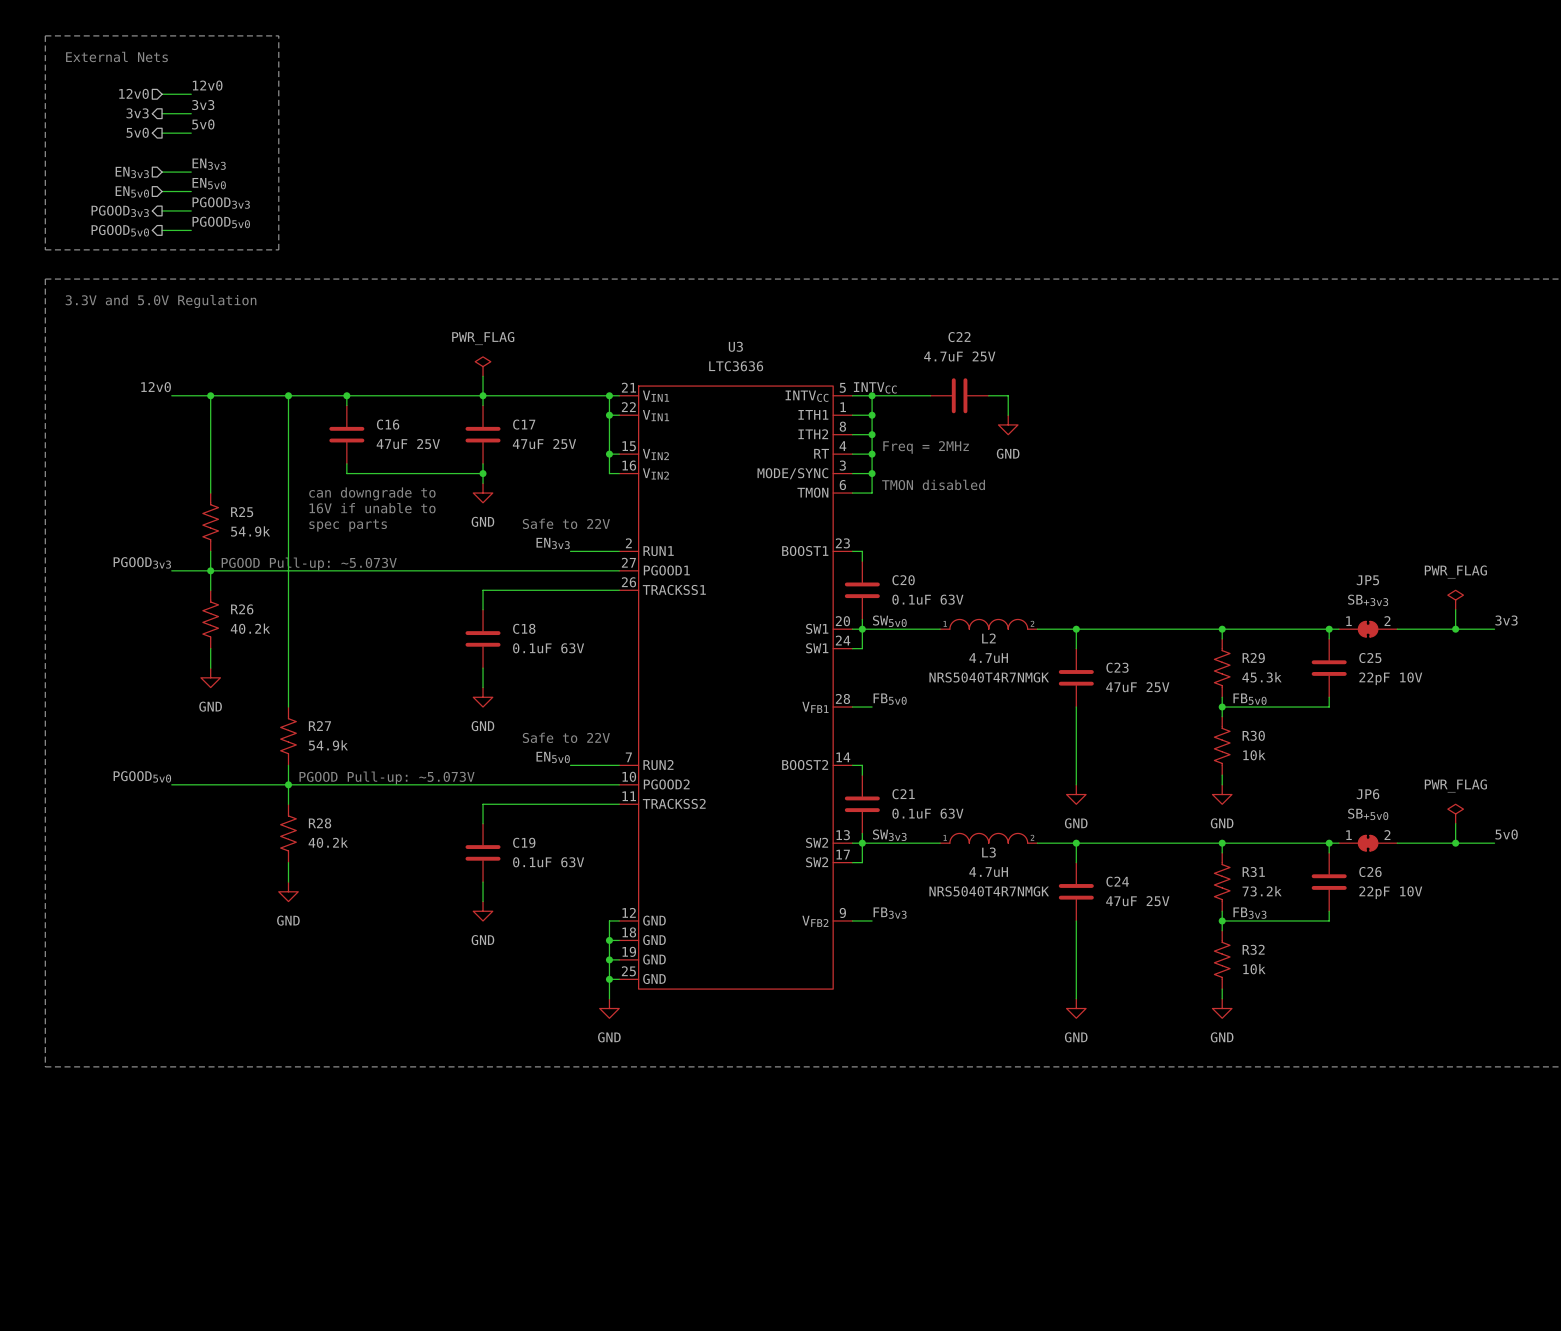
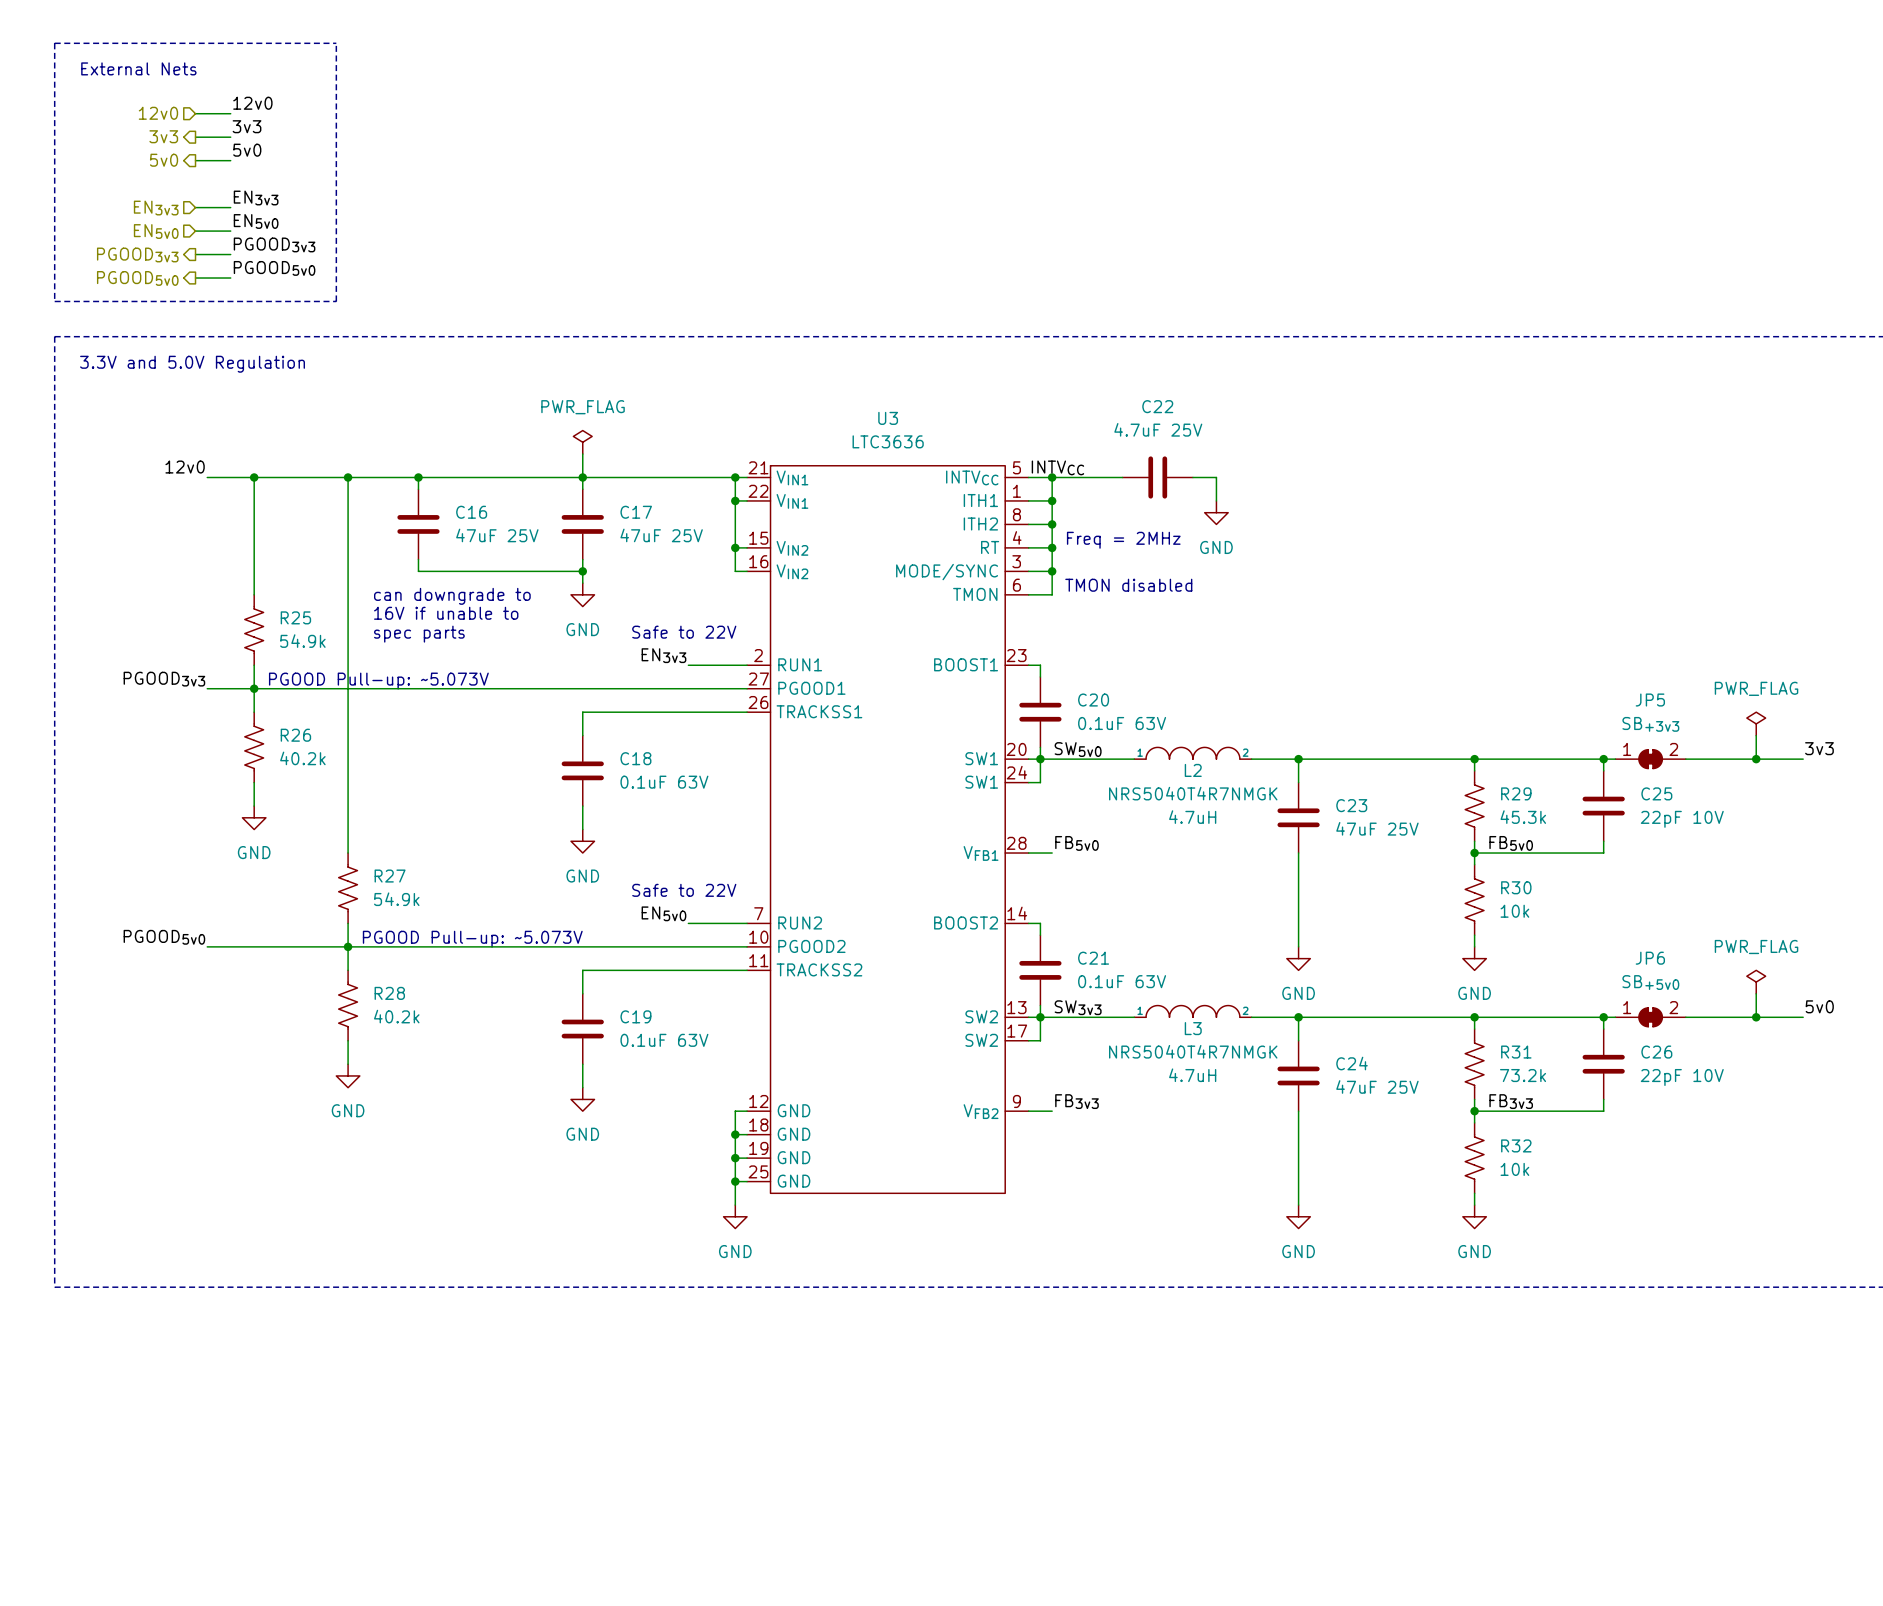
L2 value: 4.7uH (988, 658) -> NRS5040T4R7NMGK (1193, 793)
L2 text: NRS5040T4R7NMGK (989, 677) -> 4.7uH (1192, 817)
L3 value: 4.7uH (988, 872) -> NRS5040T4R7NMGK (1193, 1051)
L3 text: NRS5040T4R7NMGK (989, 891) -> 4.7uH (1192, 1075)

